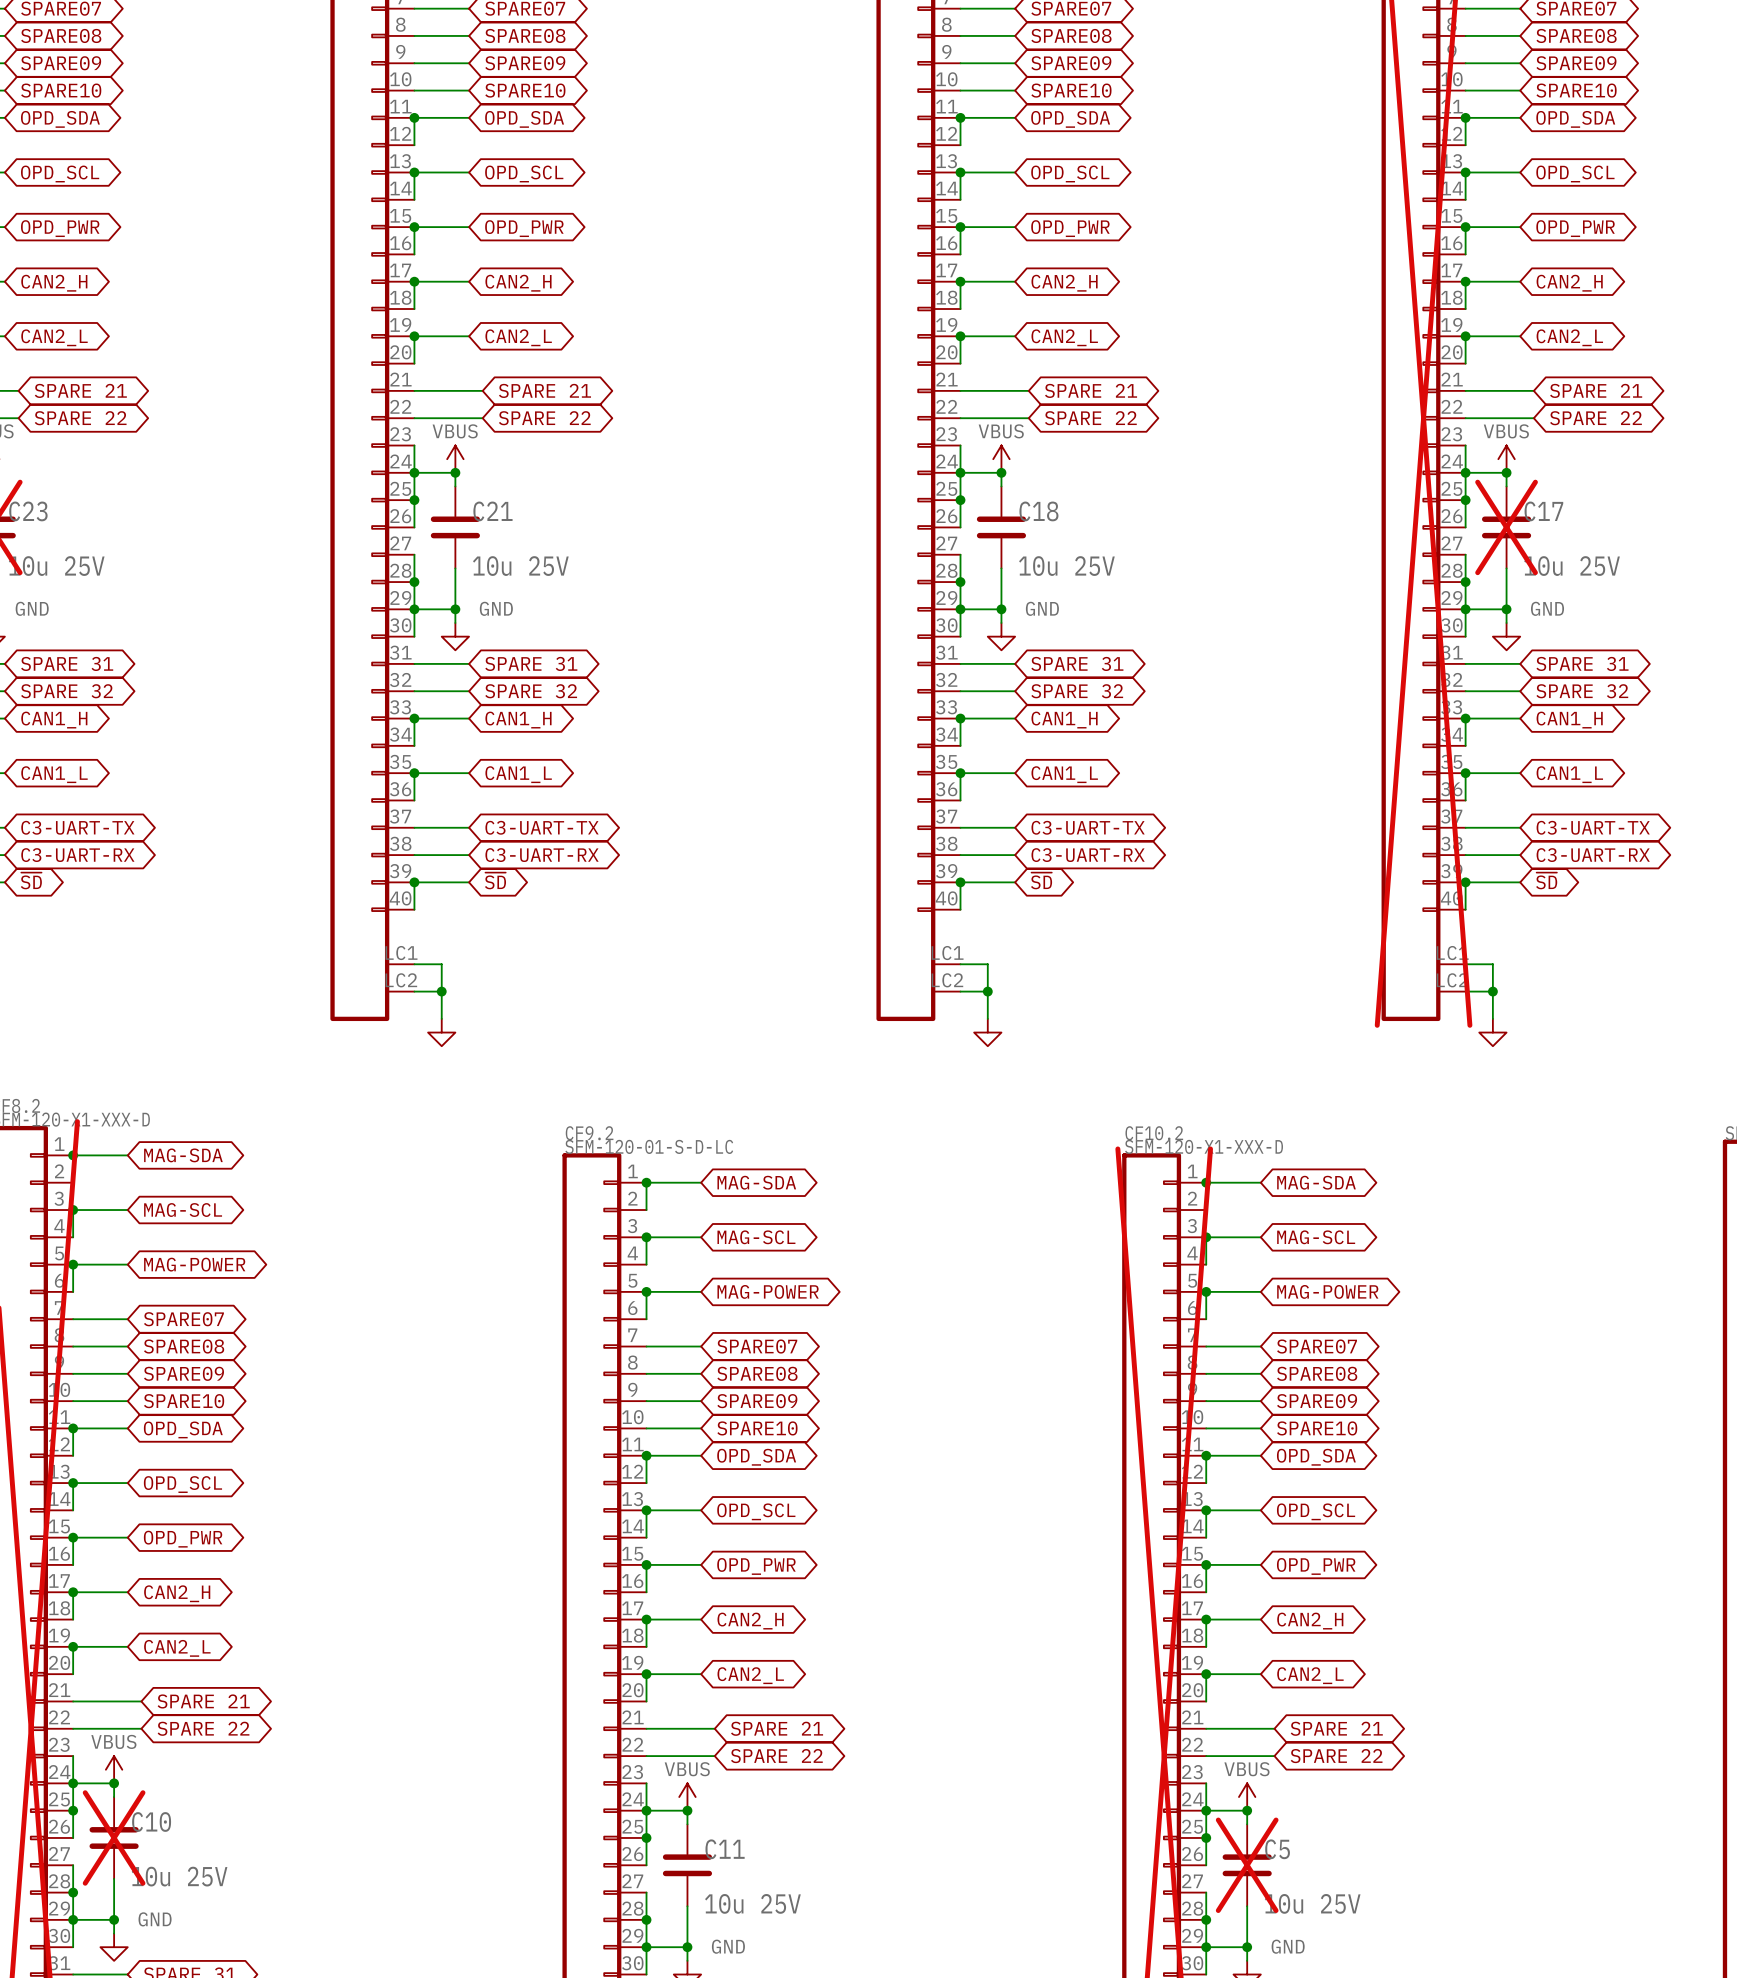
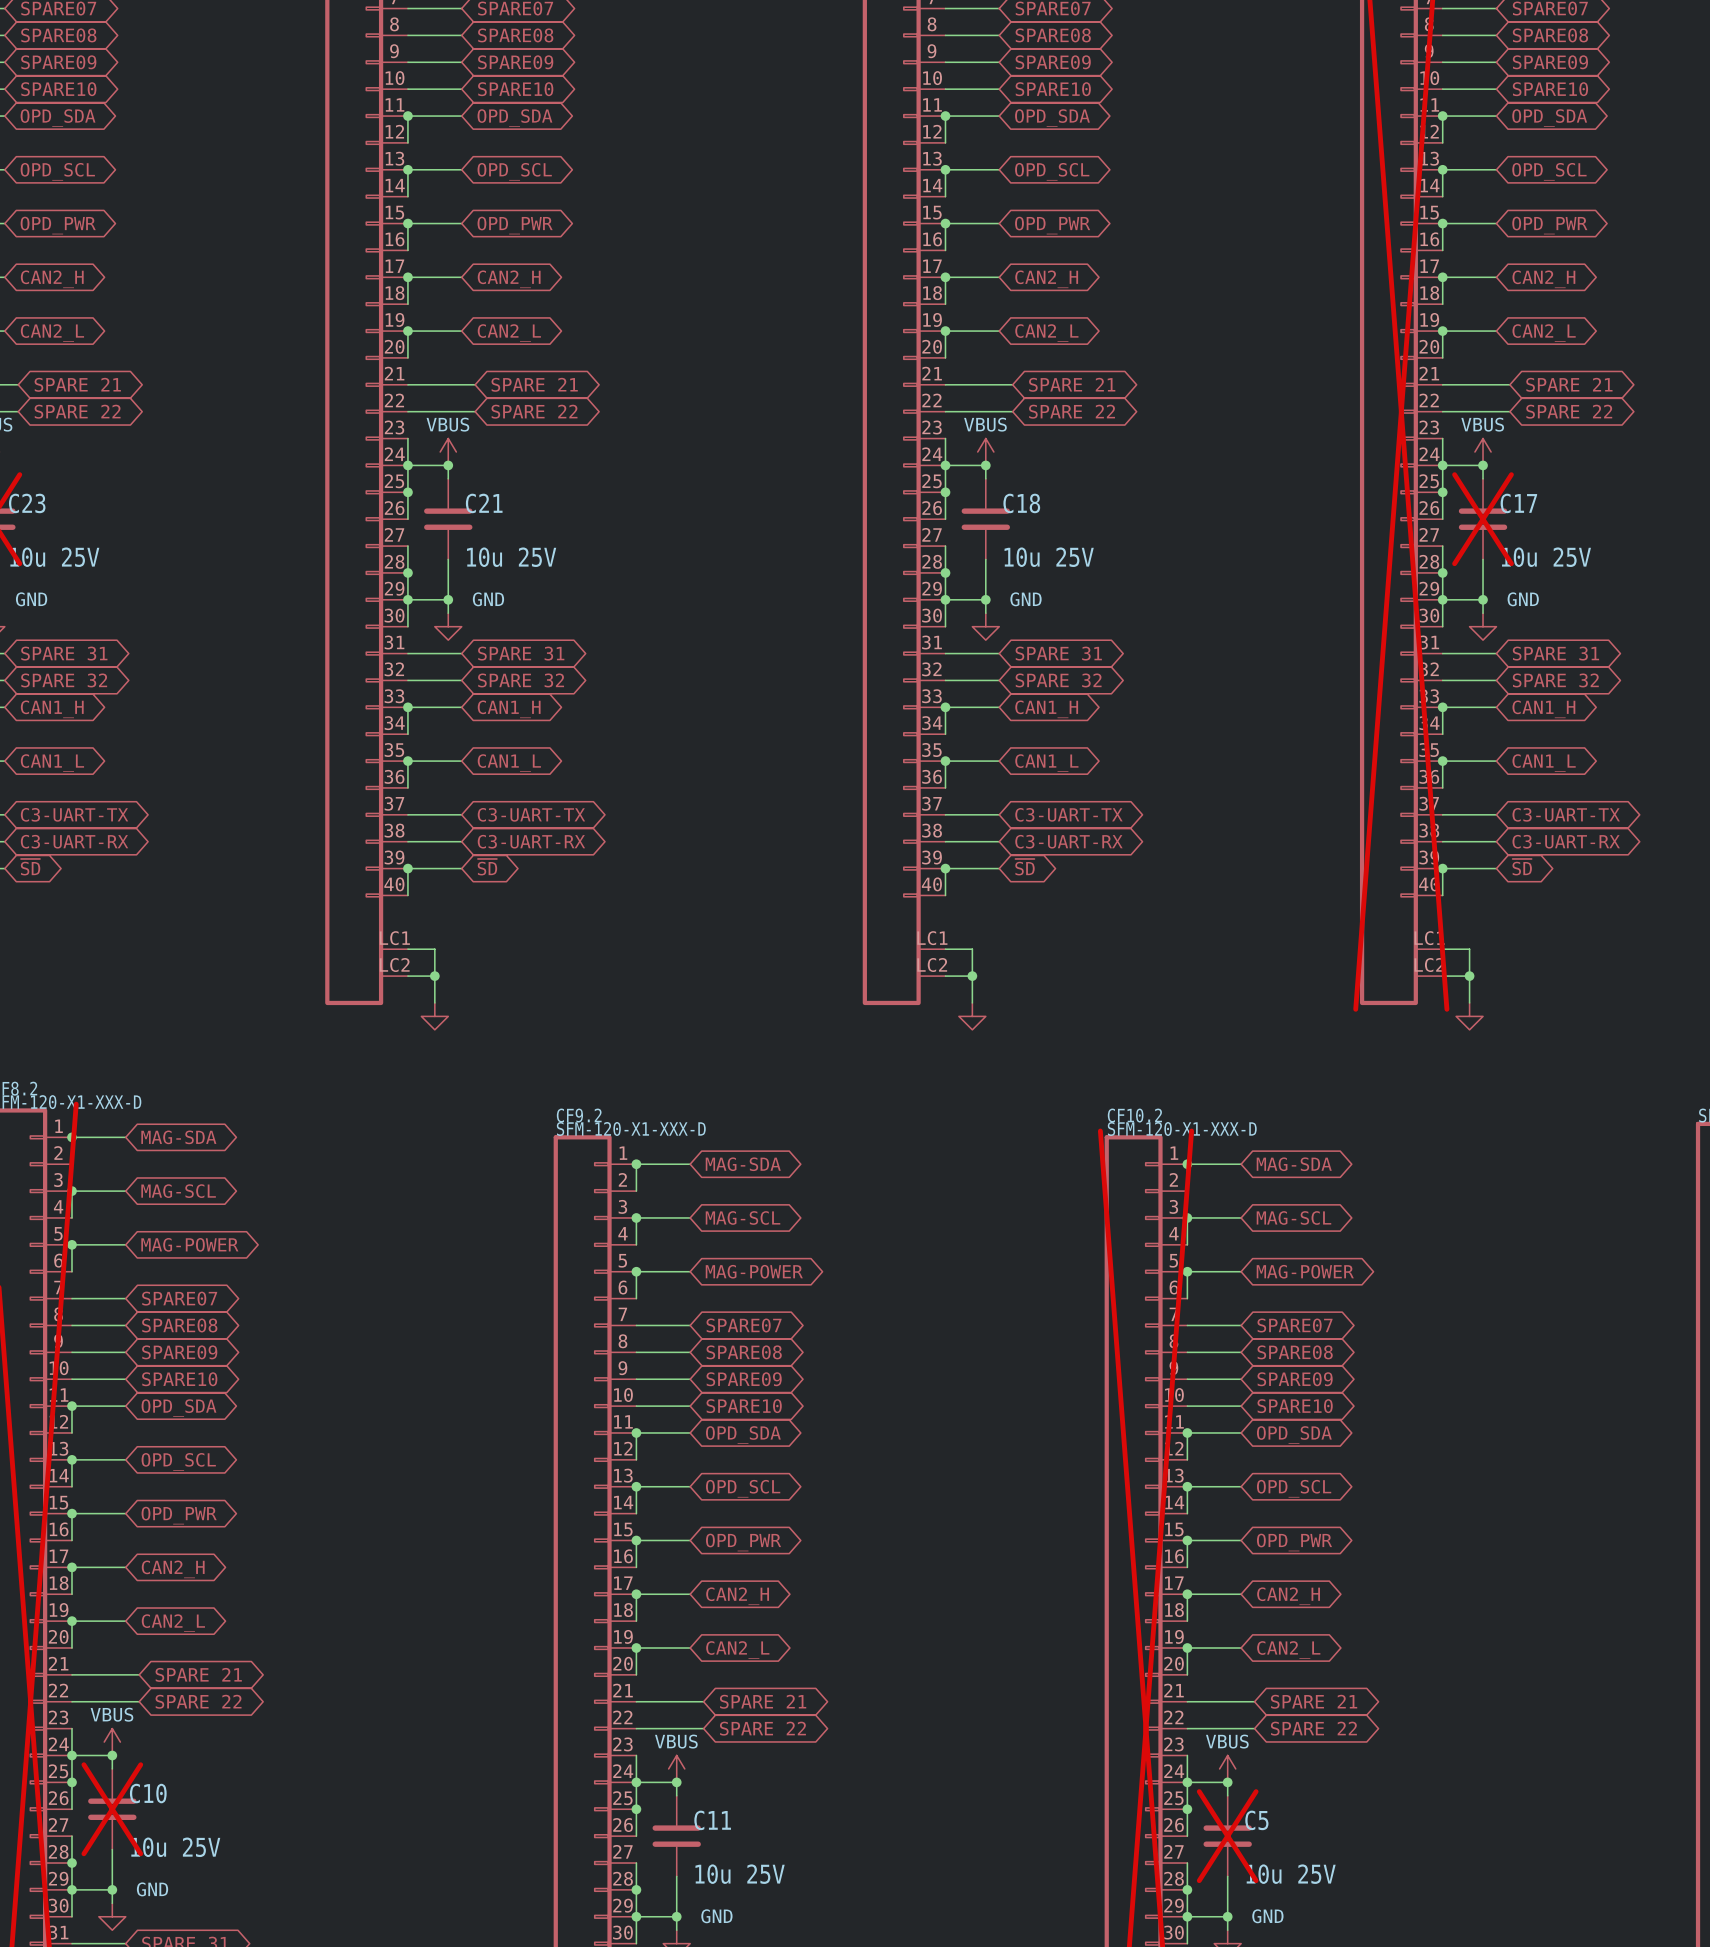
CF9.2 value: SFM-120-01-S-D-LC (649, 1146) -> SFM-120-X1-XXX-D (631, 1128)

